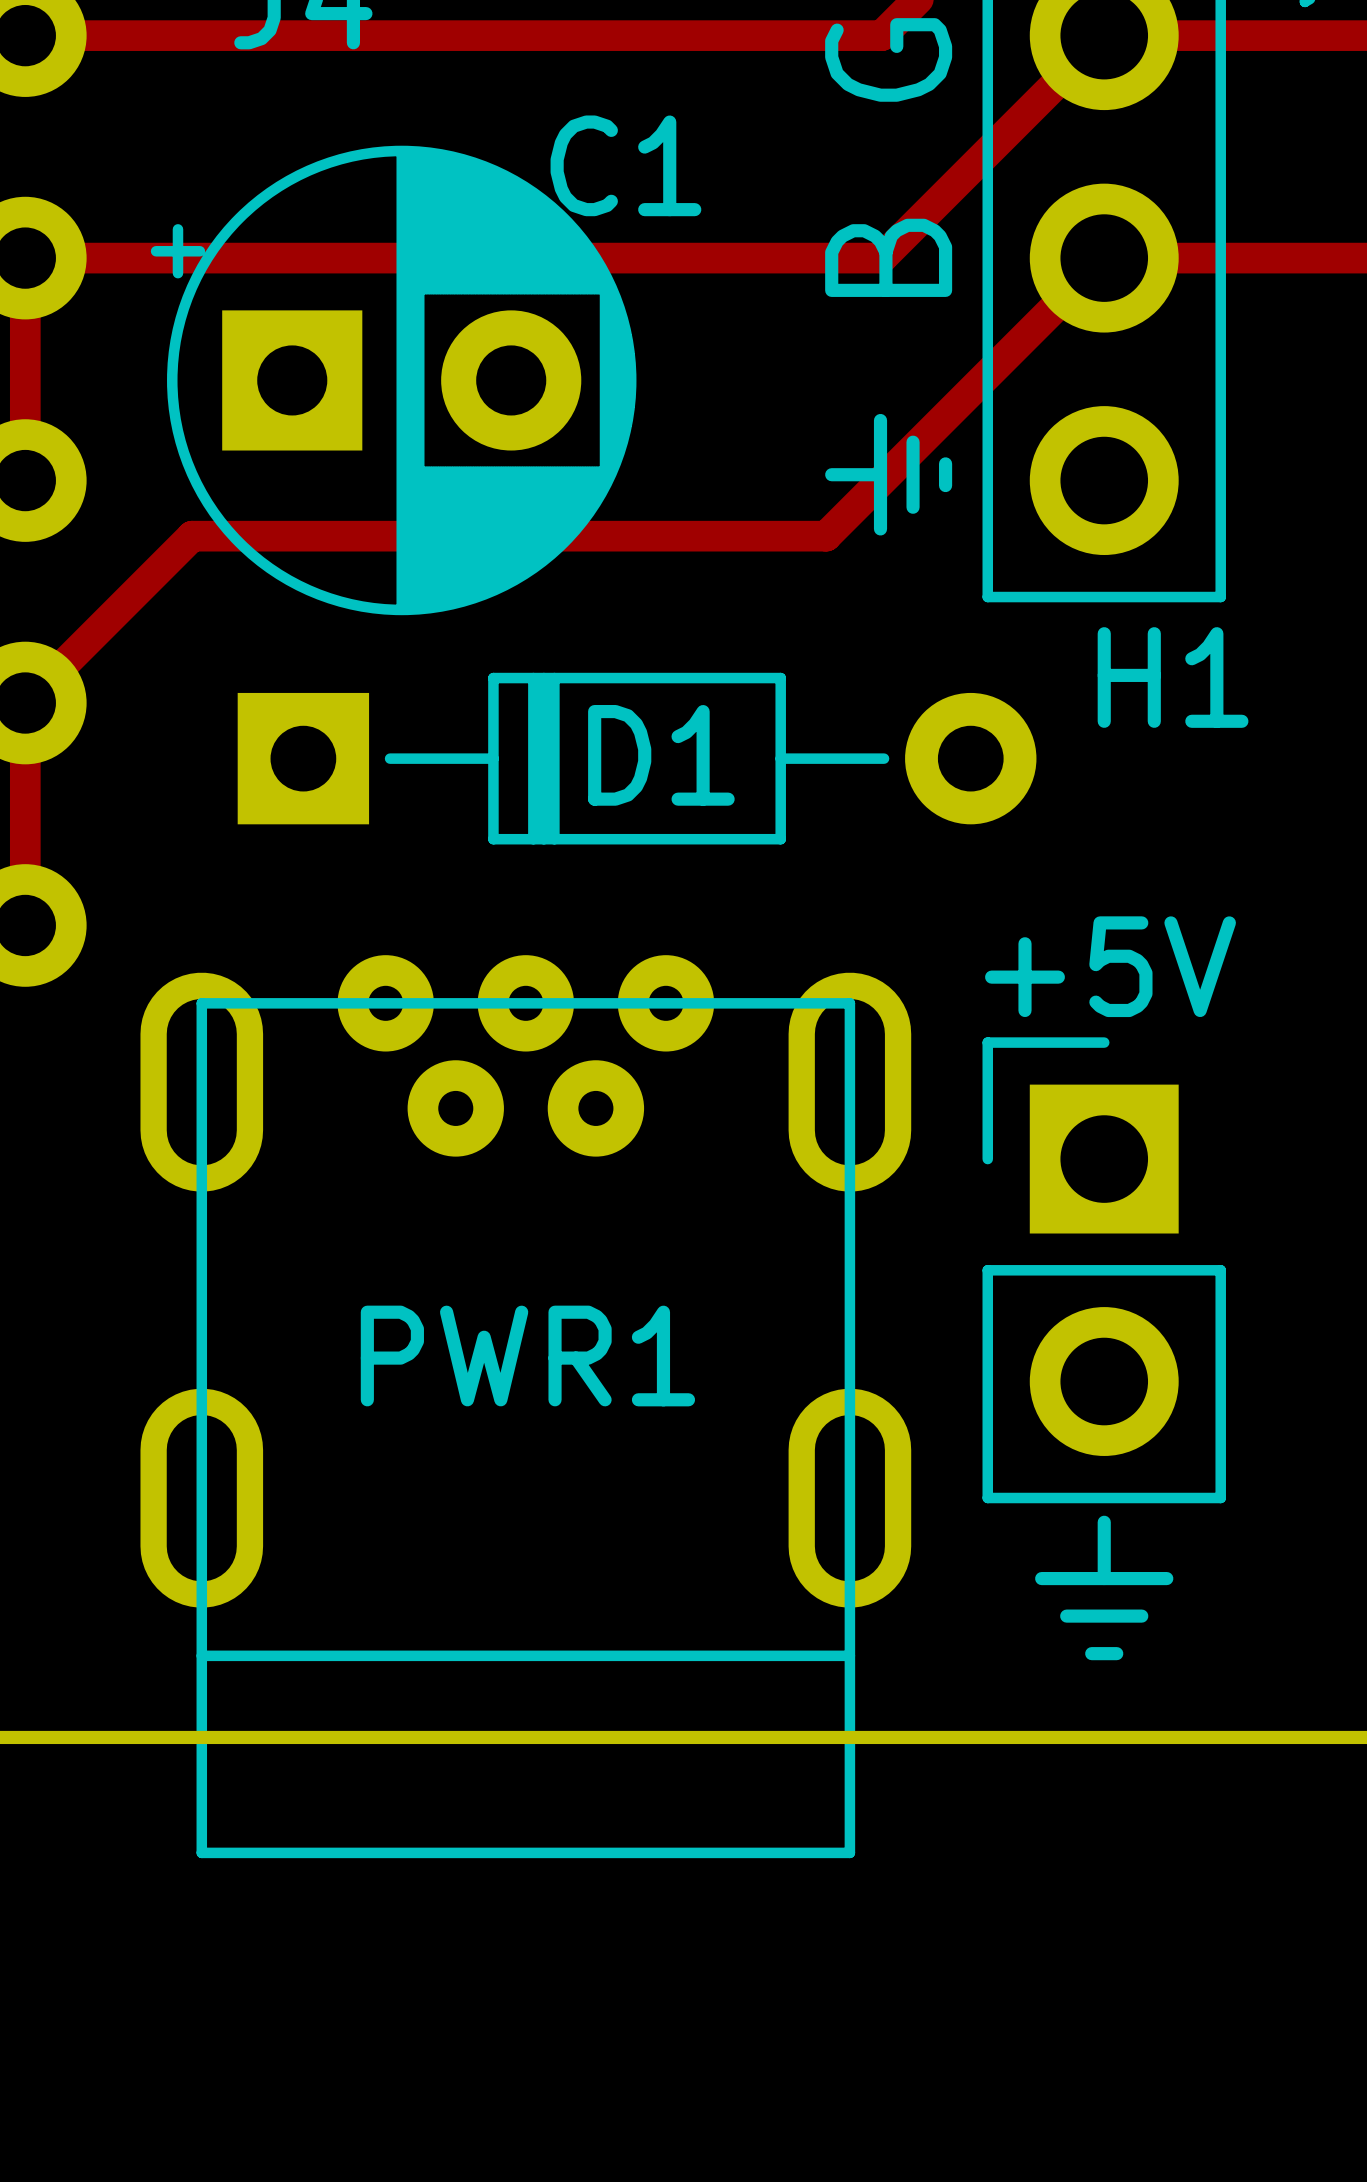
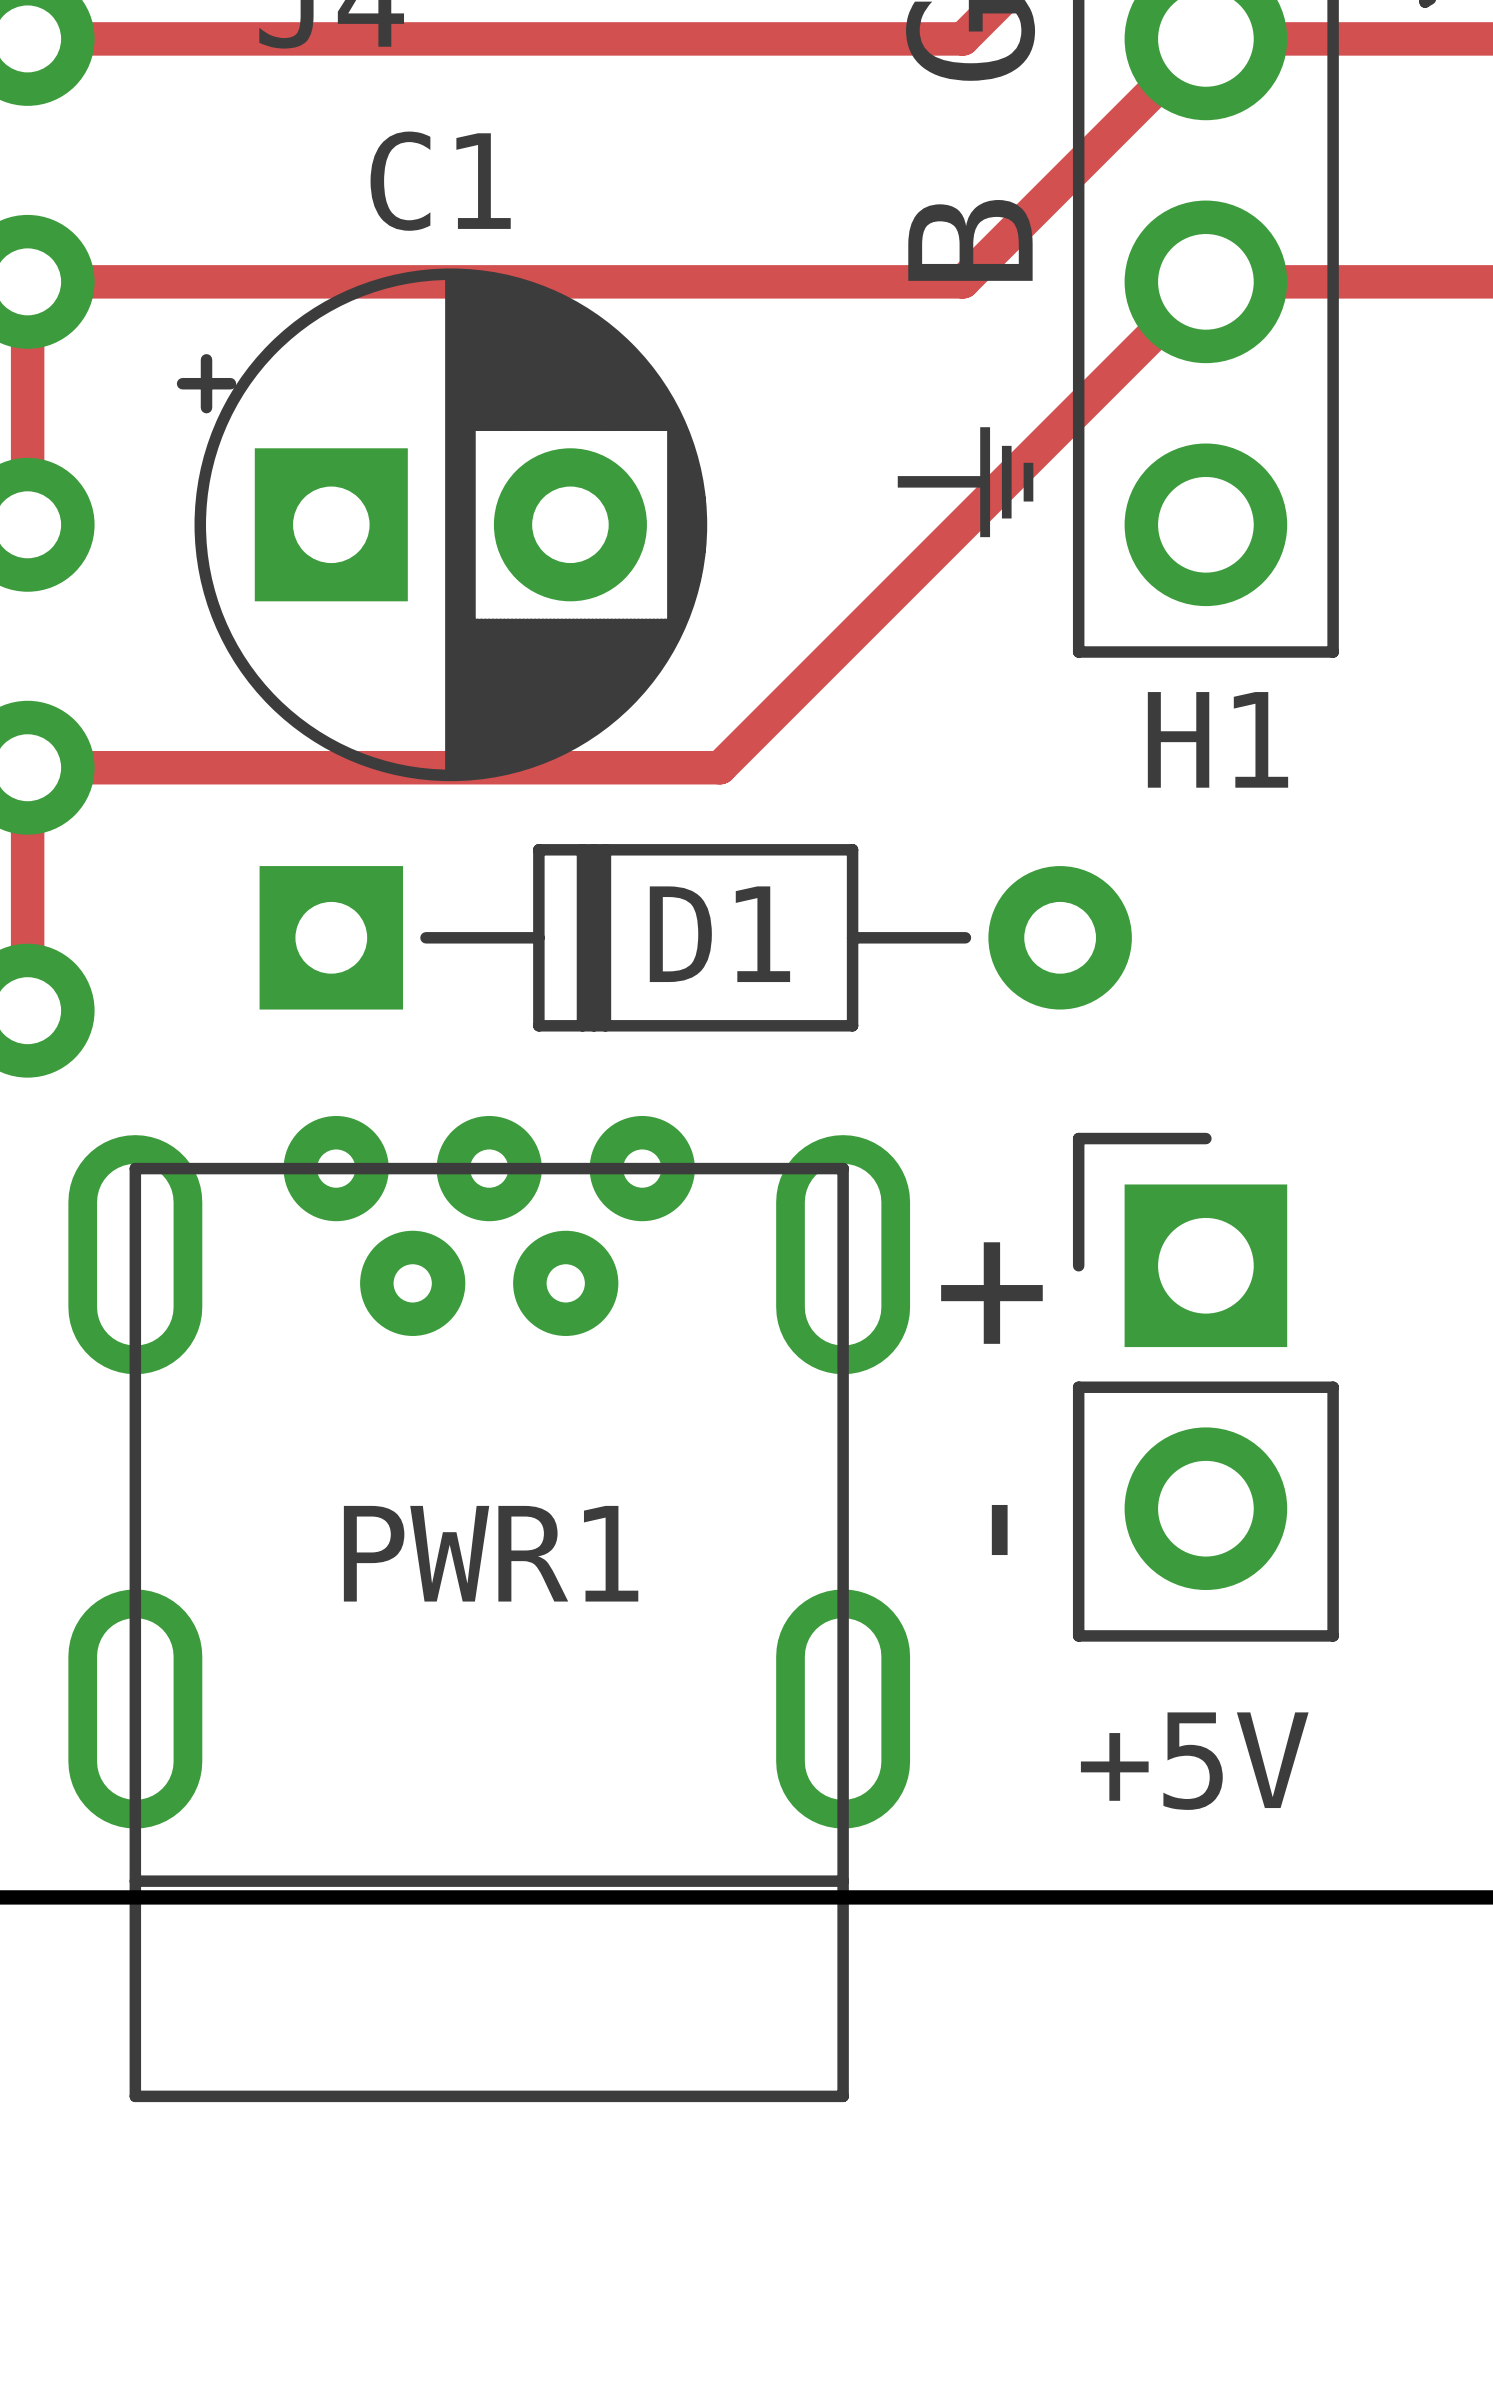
C1 name position: C1 (625, 165) -> C1 (440, 181)
C1 position: (393, 380) -> (442, 524)
track: (826, 536) (192, 536) (25, 703) -> (902, 585) (720, 767) (27, 767)
H1 name position: H1 (1173, 677) -> H1 (1217, 739)
D1 position: (637, 758) -> (695, 937)
part value position: +5V (1110, 966) -> +5V (1194, 1761)
part text: none -> - + (991, 1398)
PWR1 position: (525, 1406) -> (489, 1609)
part text: ⏚ (1104, 1587) -> none

